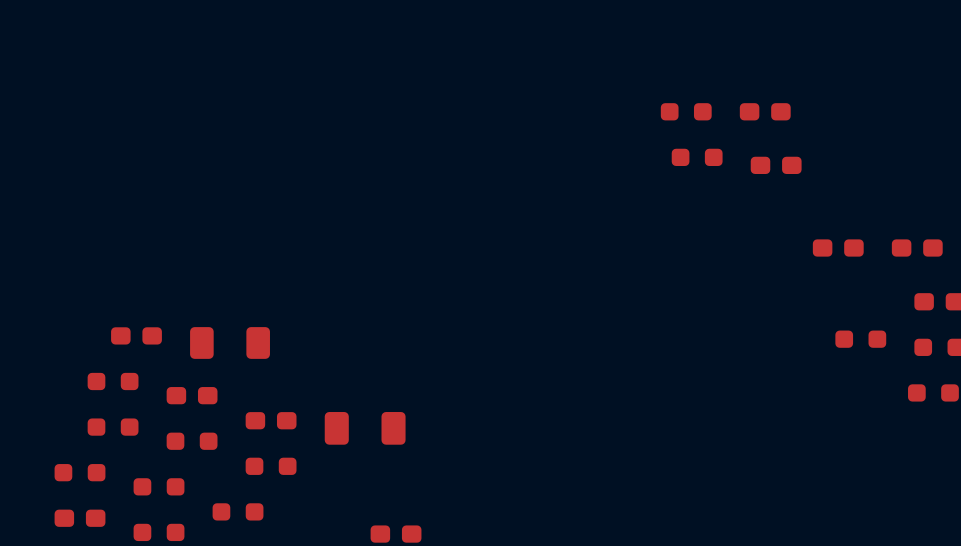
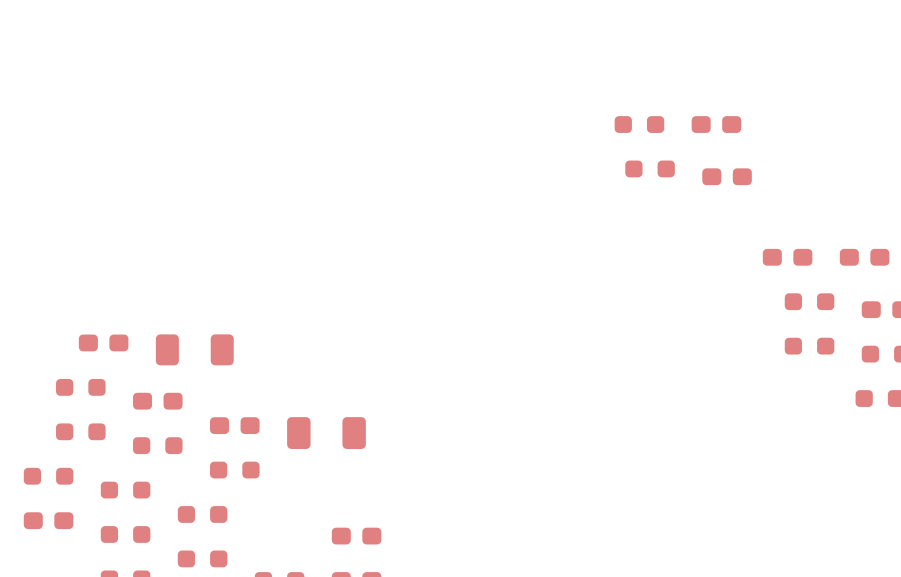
part: none -> (809, 301)

